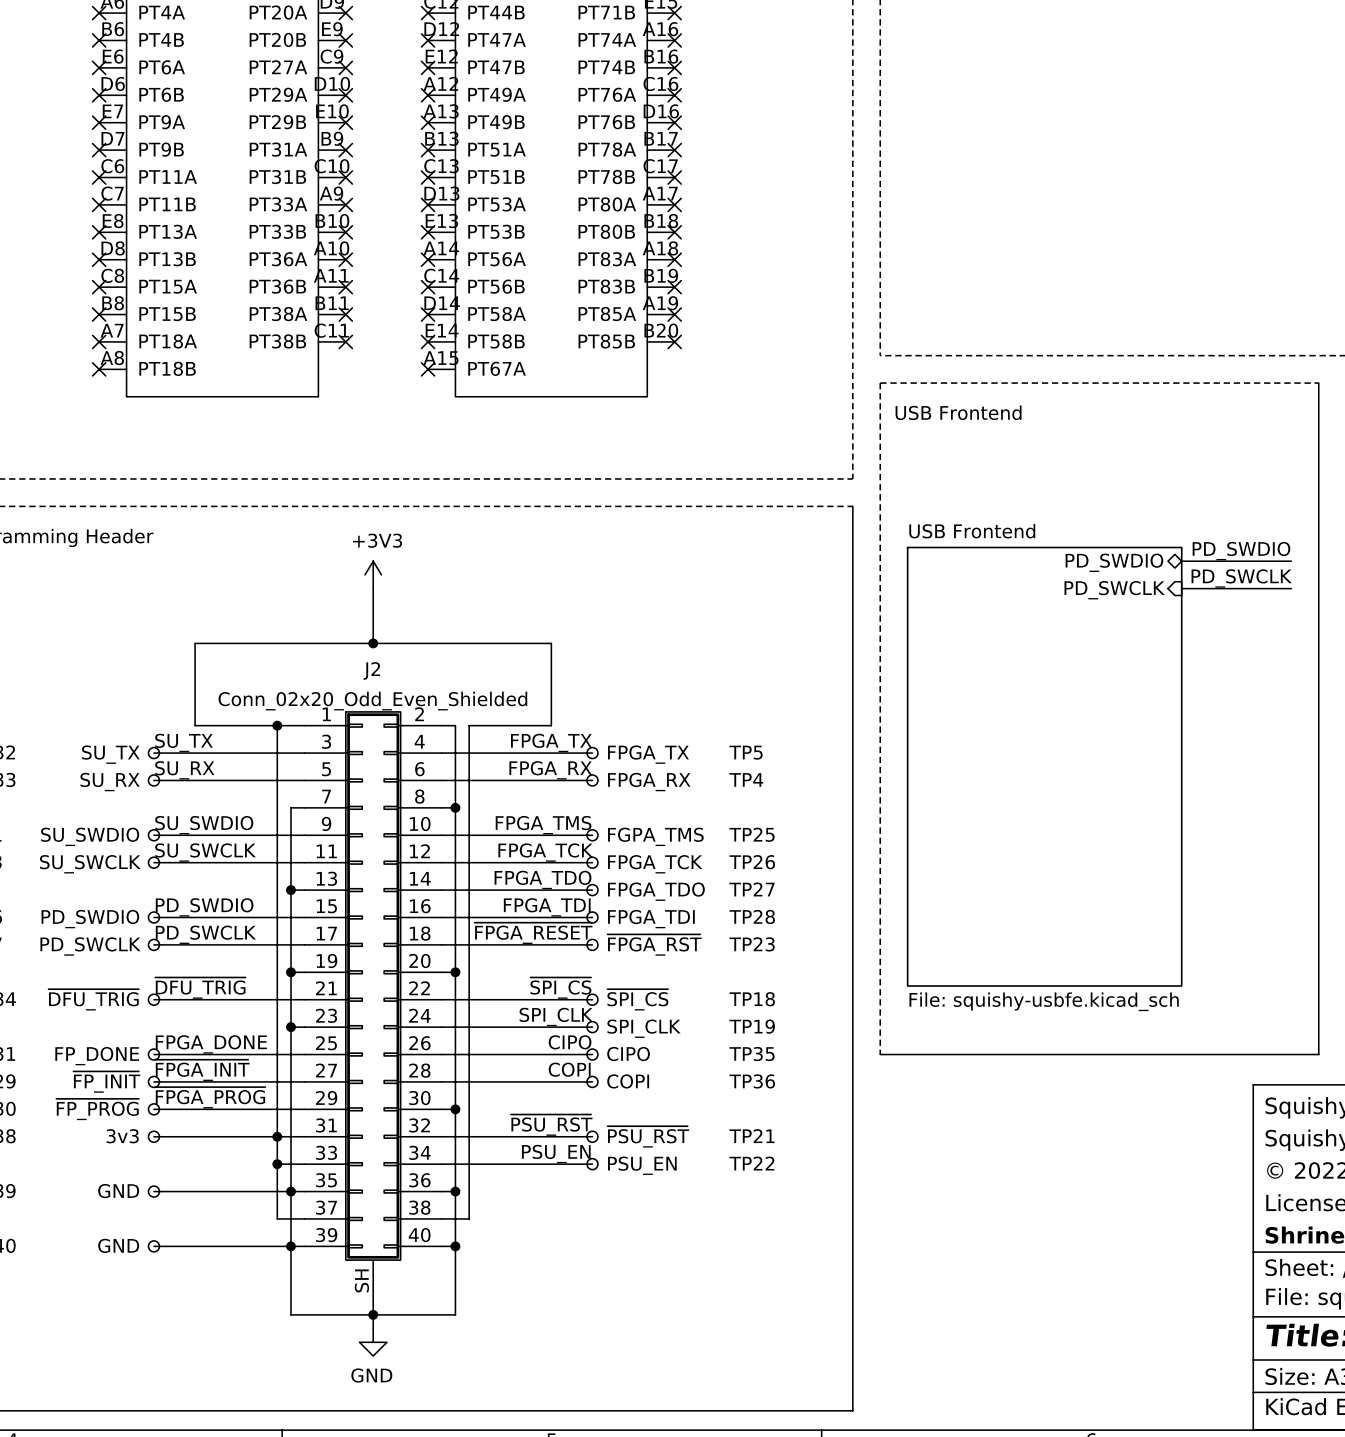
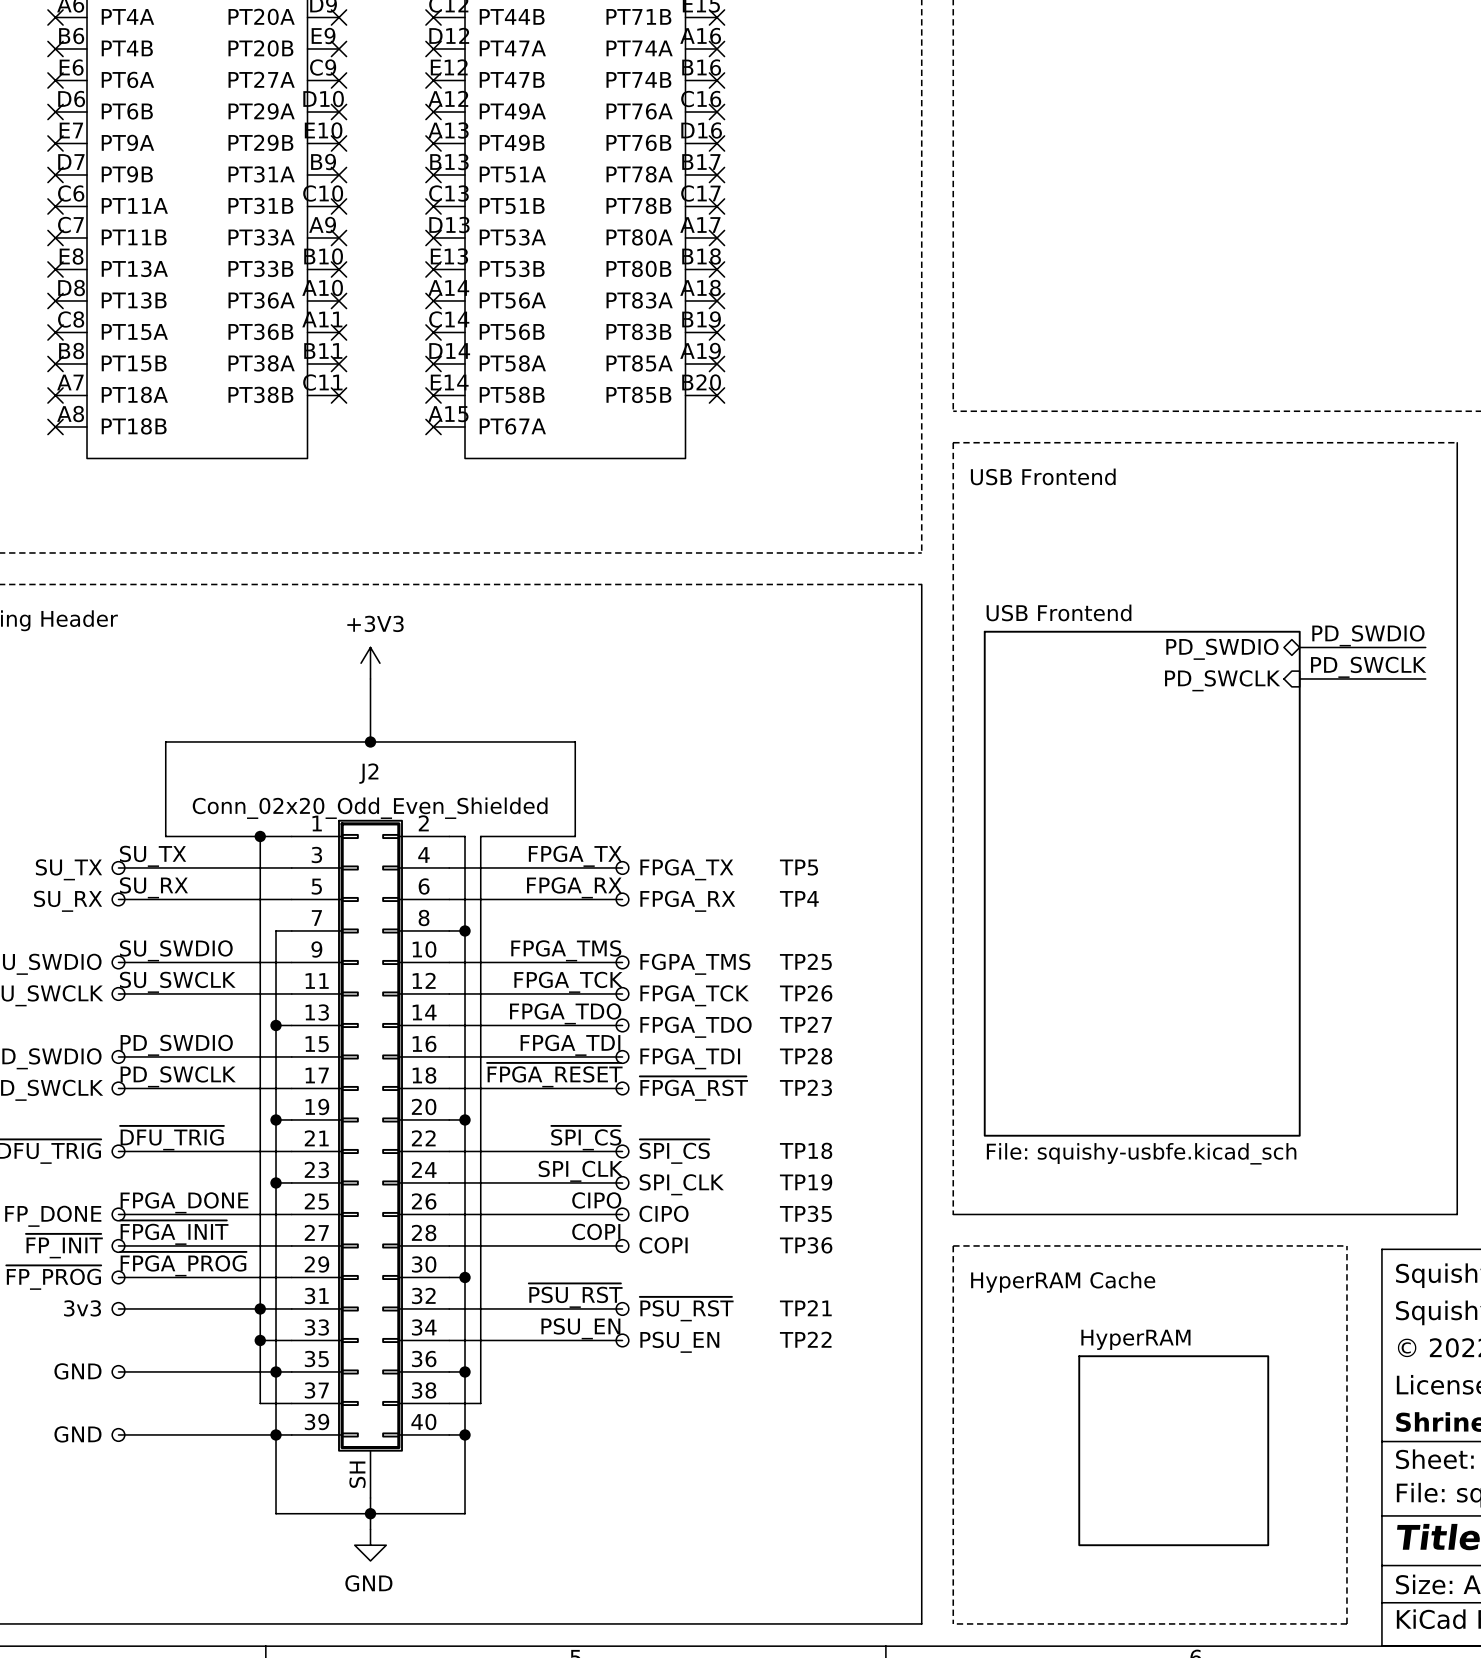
line: none -> (953, 1245) (1346, 1245) (1346, 1623) (953, 1623) (953, 1245)
text: none -> HyperRAM Cache (1063, 1282)
sheet HyperRAM: none -> (1173, 1450)

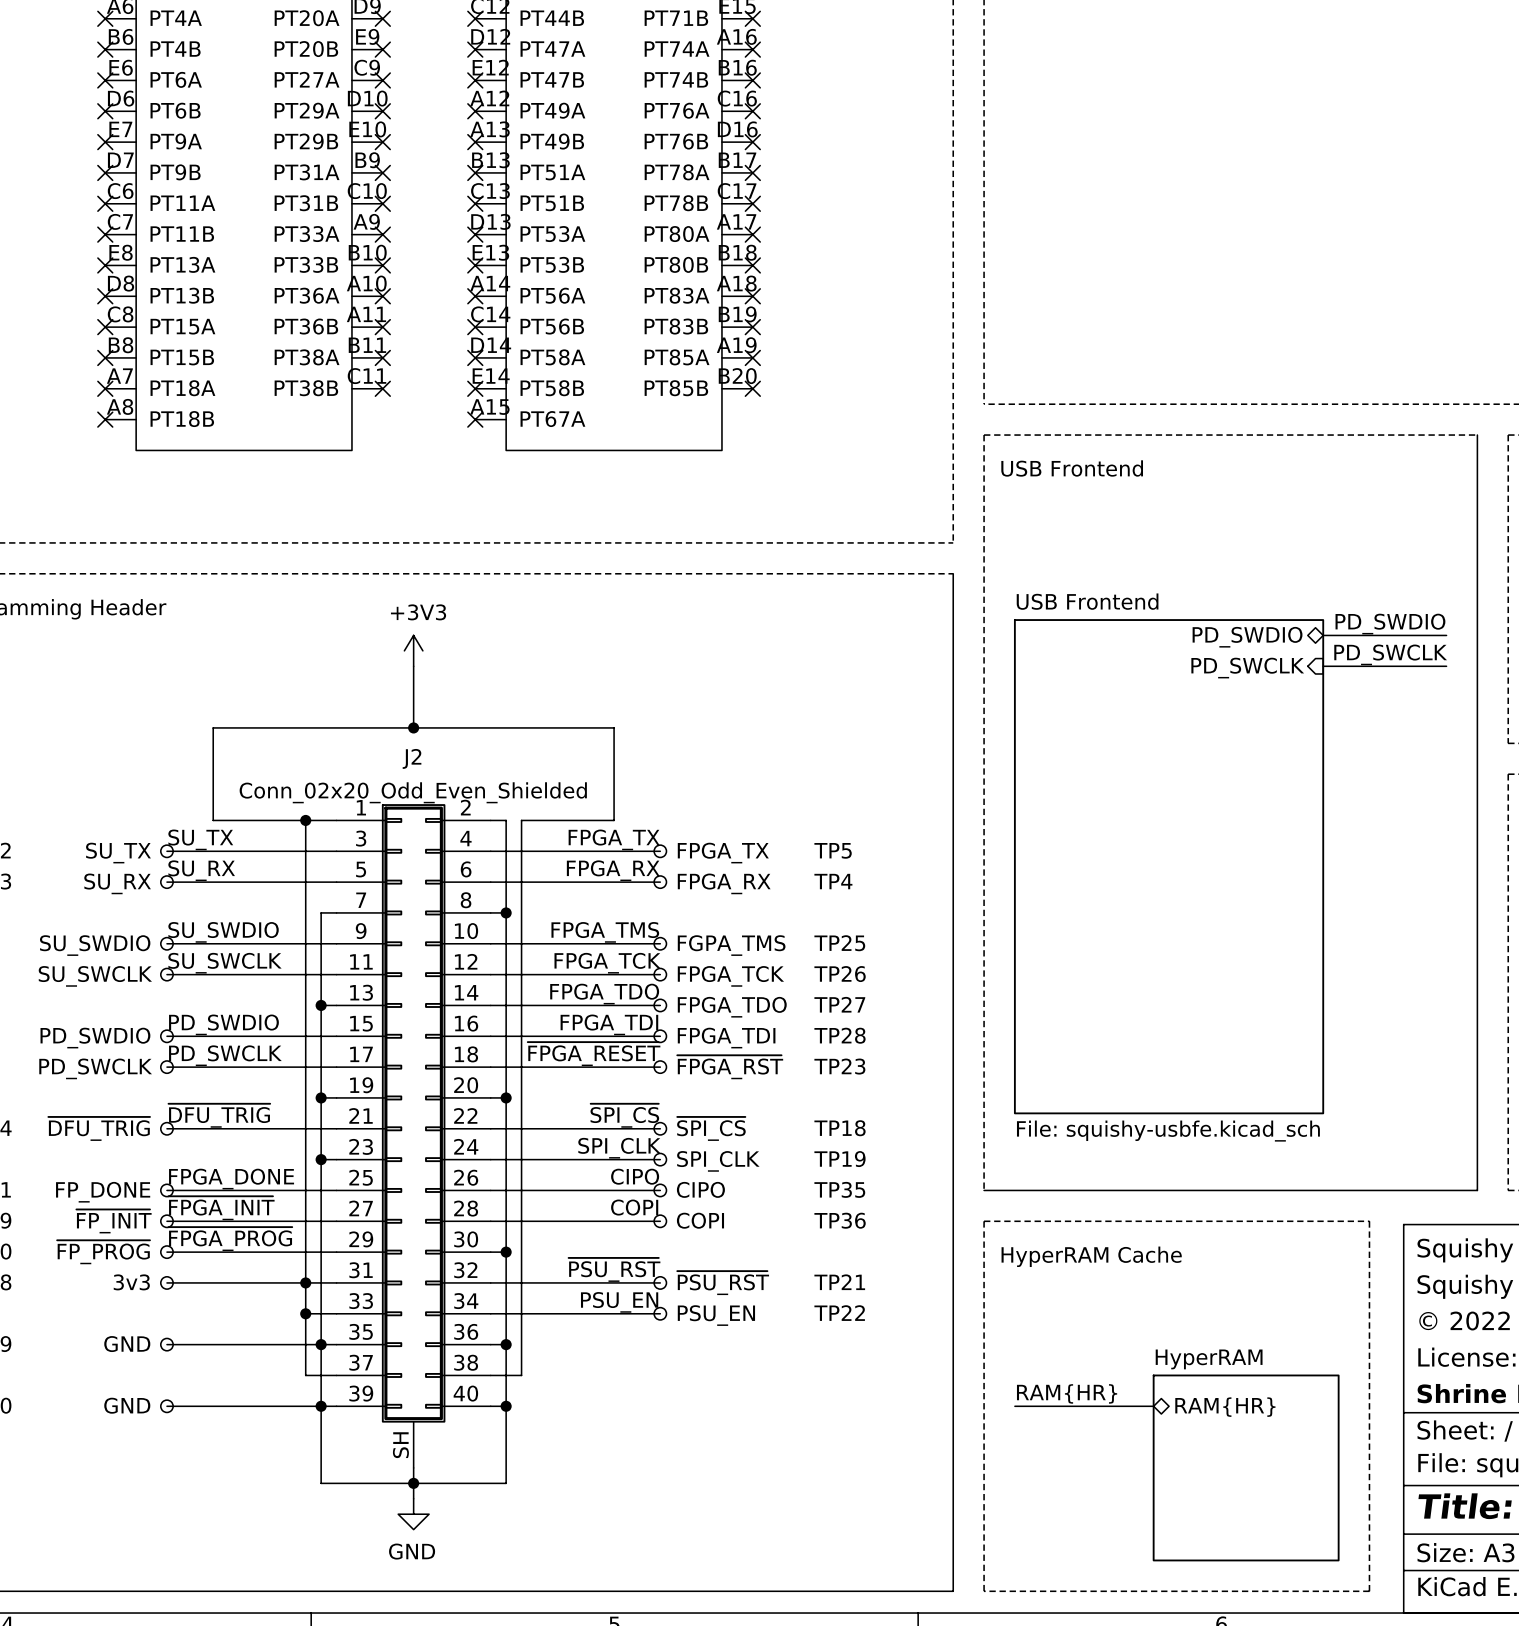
label: none -> RAM{HR} (1067, 1393)
bus: none -> (1014, 1406) (1153, 1406)
sheet pin: none -> RAM{HR} (1225, 1407)
sheet HyperRAM position: (1173, 1450) -> (1246, 1467)

